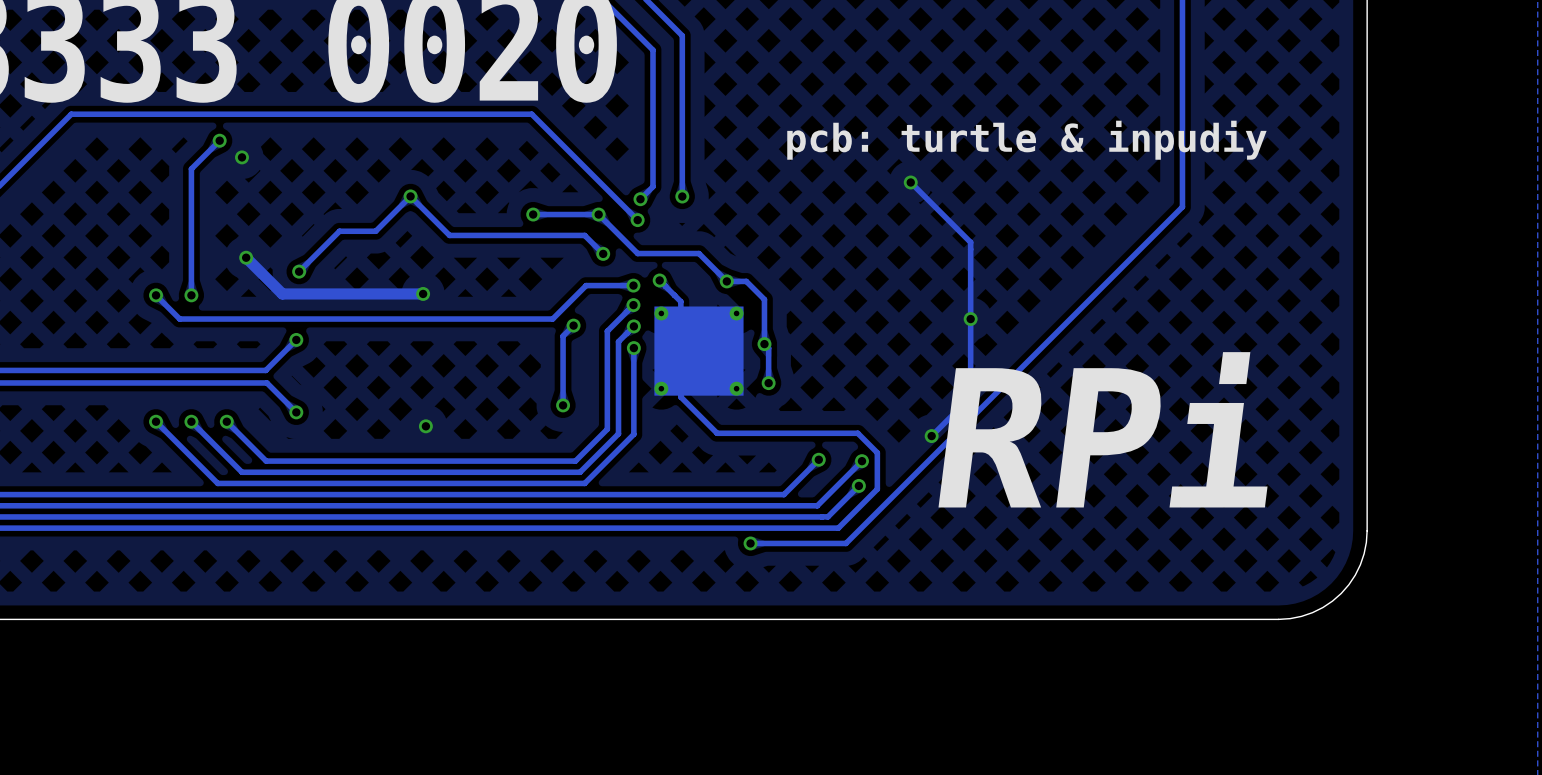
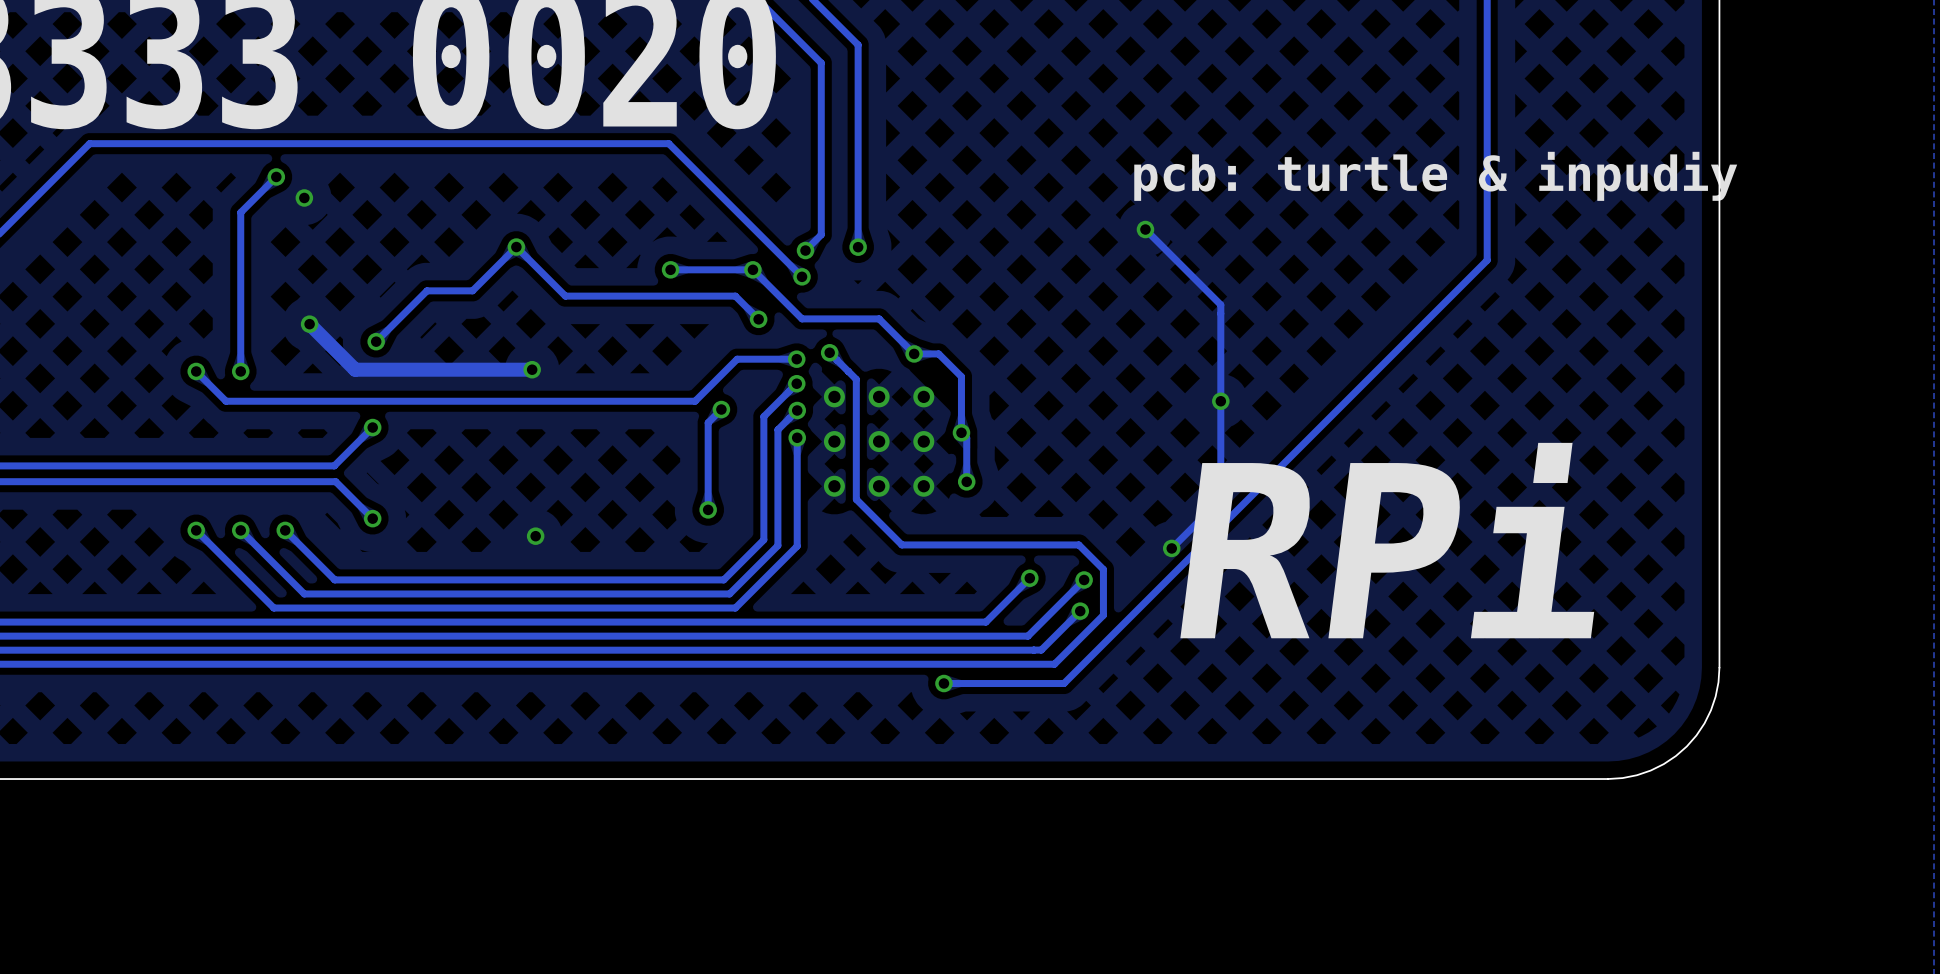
text position: pcb: turtle & inpudiy (1026, 140) -> pcb: turtle & inpudiy (1435, 176)
part footprint: [654, 306, 744, 396] -> [823, 386, 935, 497]

